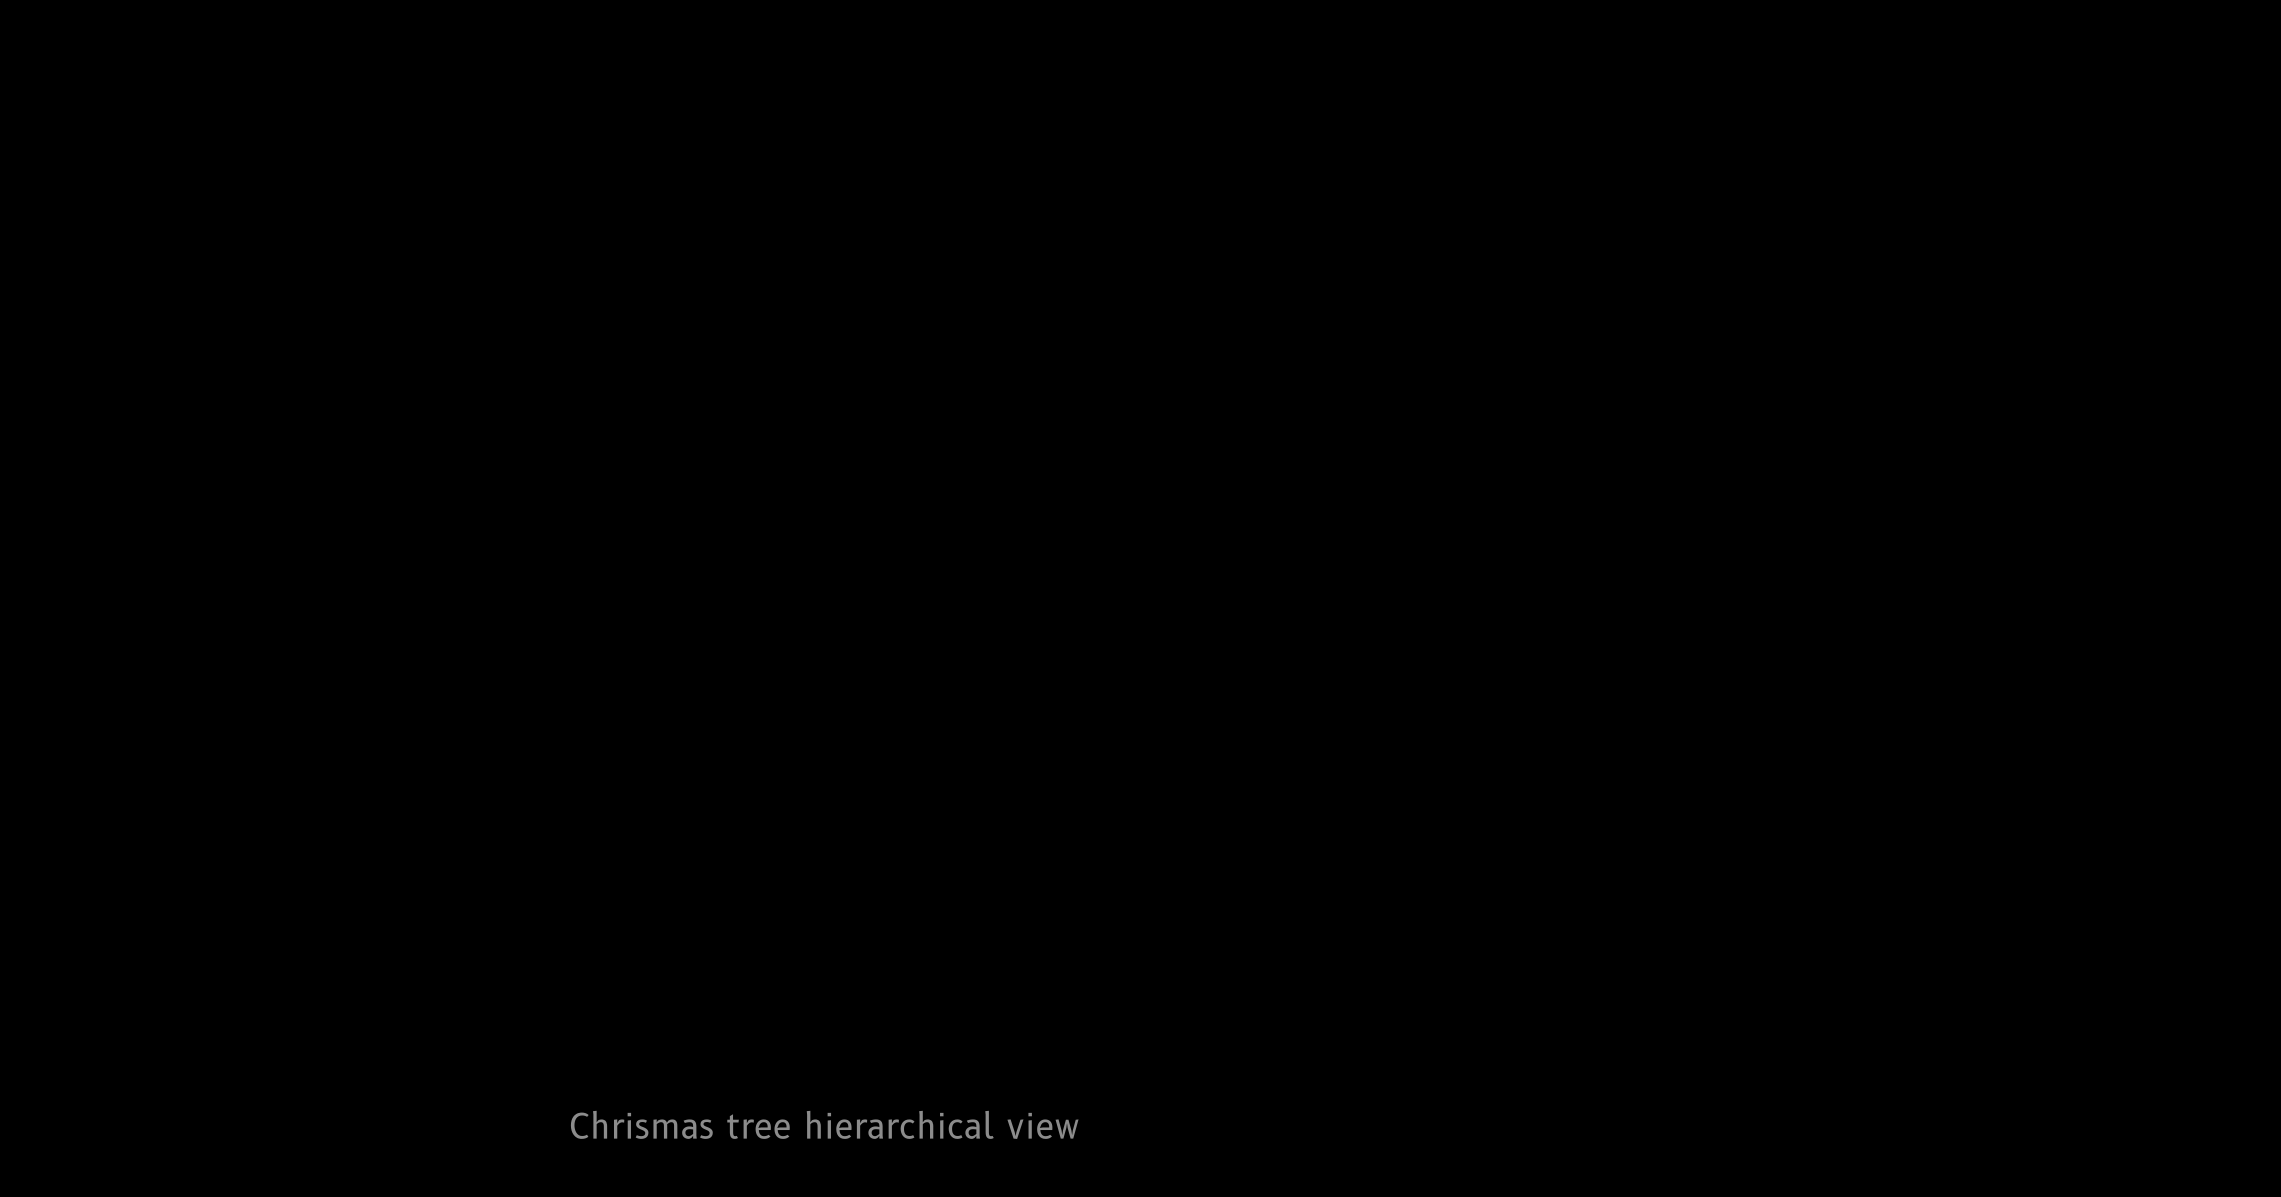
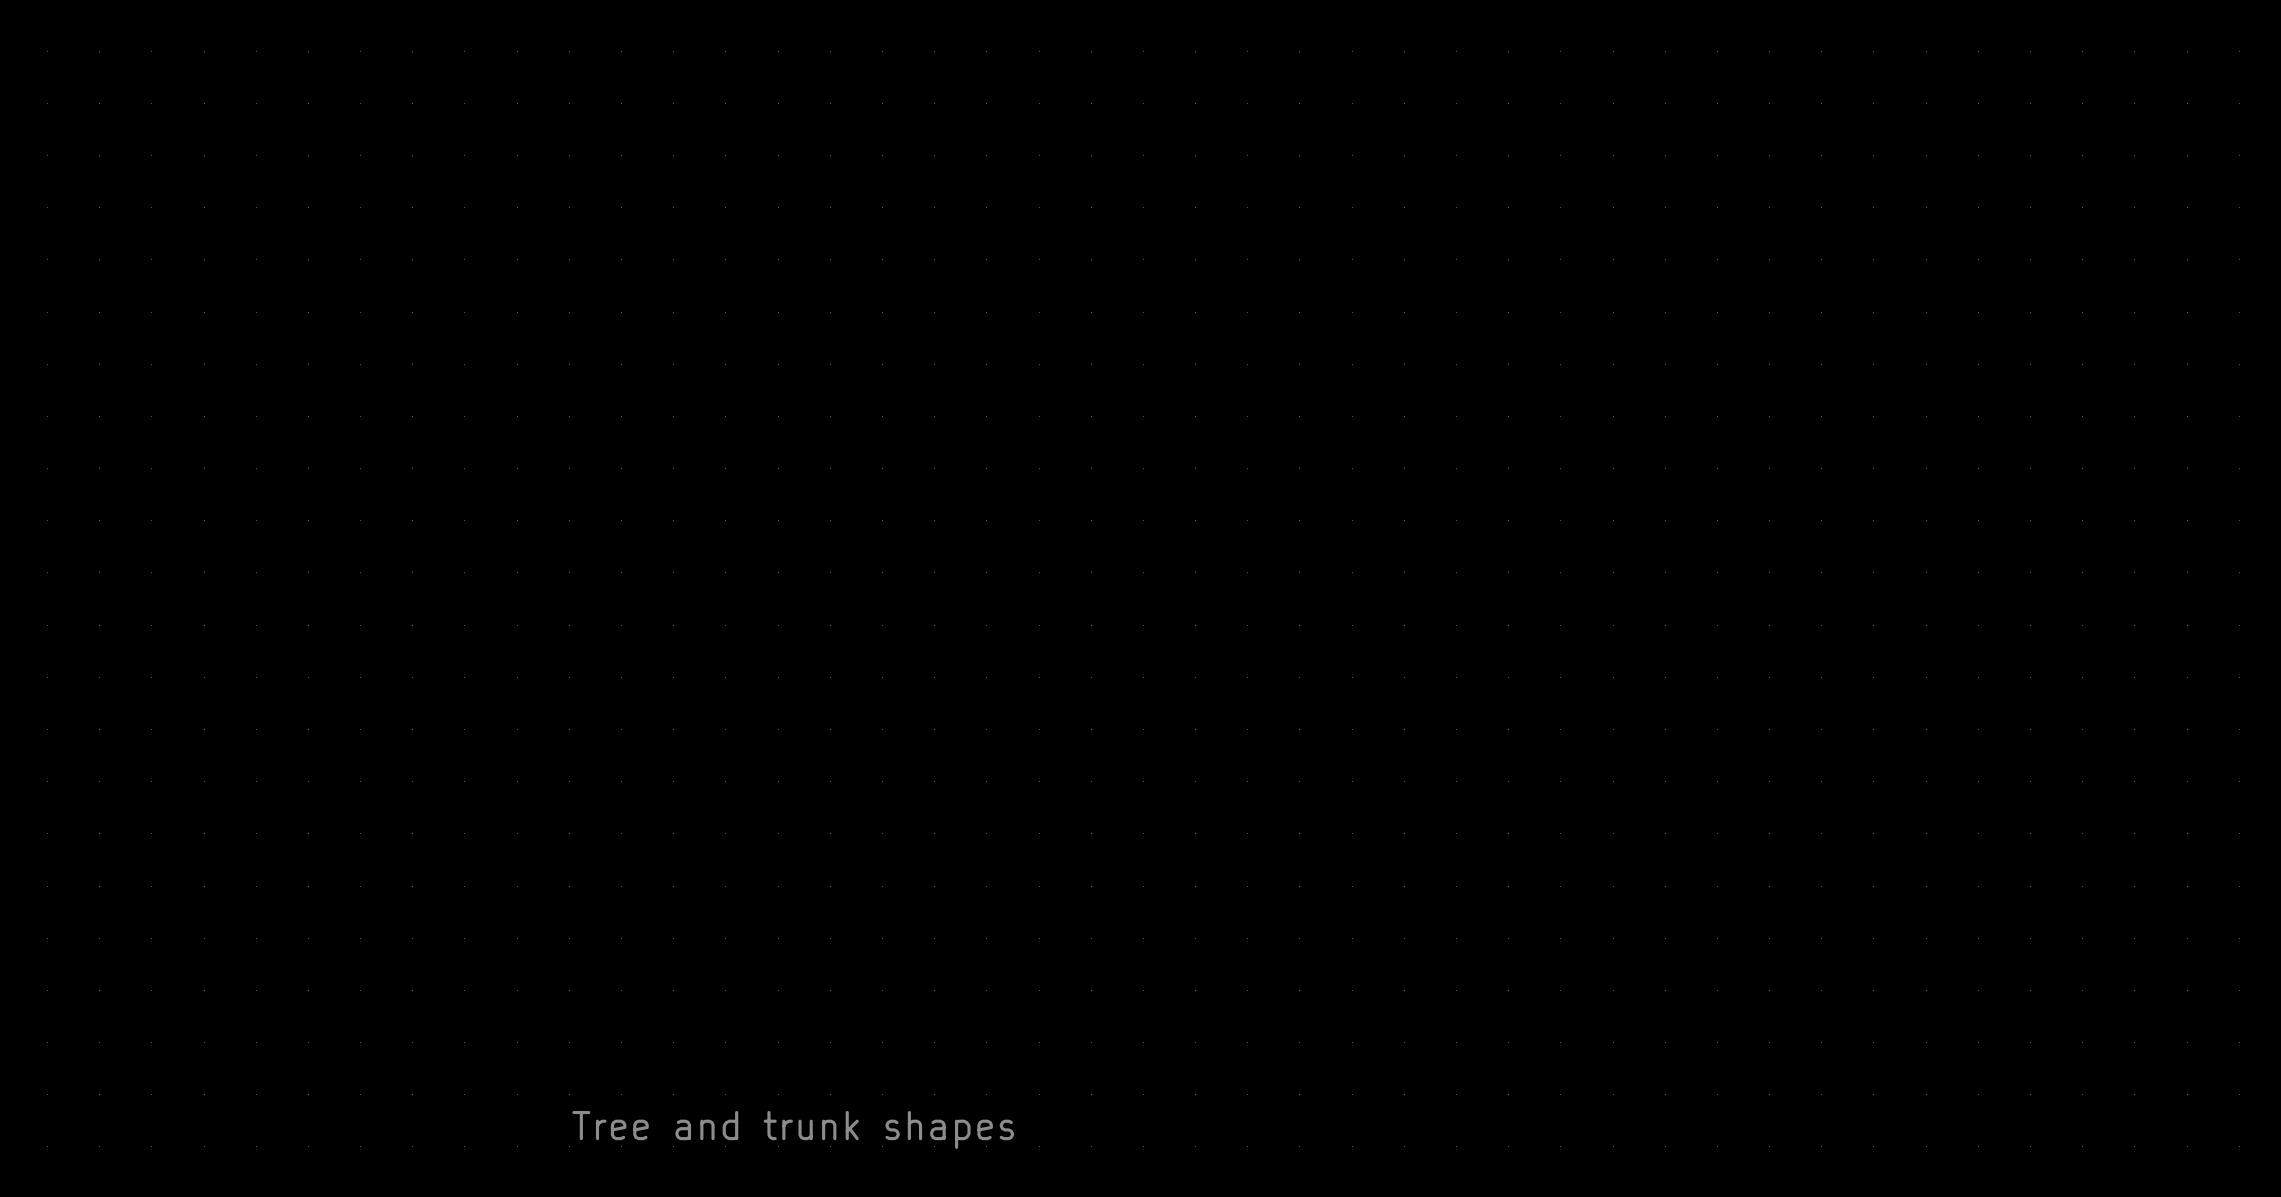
text: Chrismas tree hierarchical view (824, 1124) -> Tree and trunk shapes (793, 1129)

